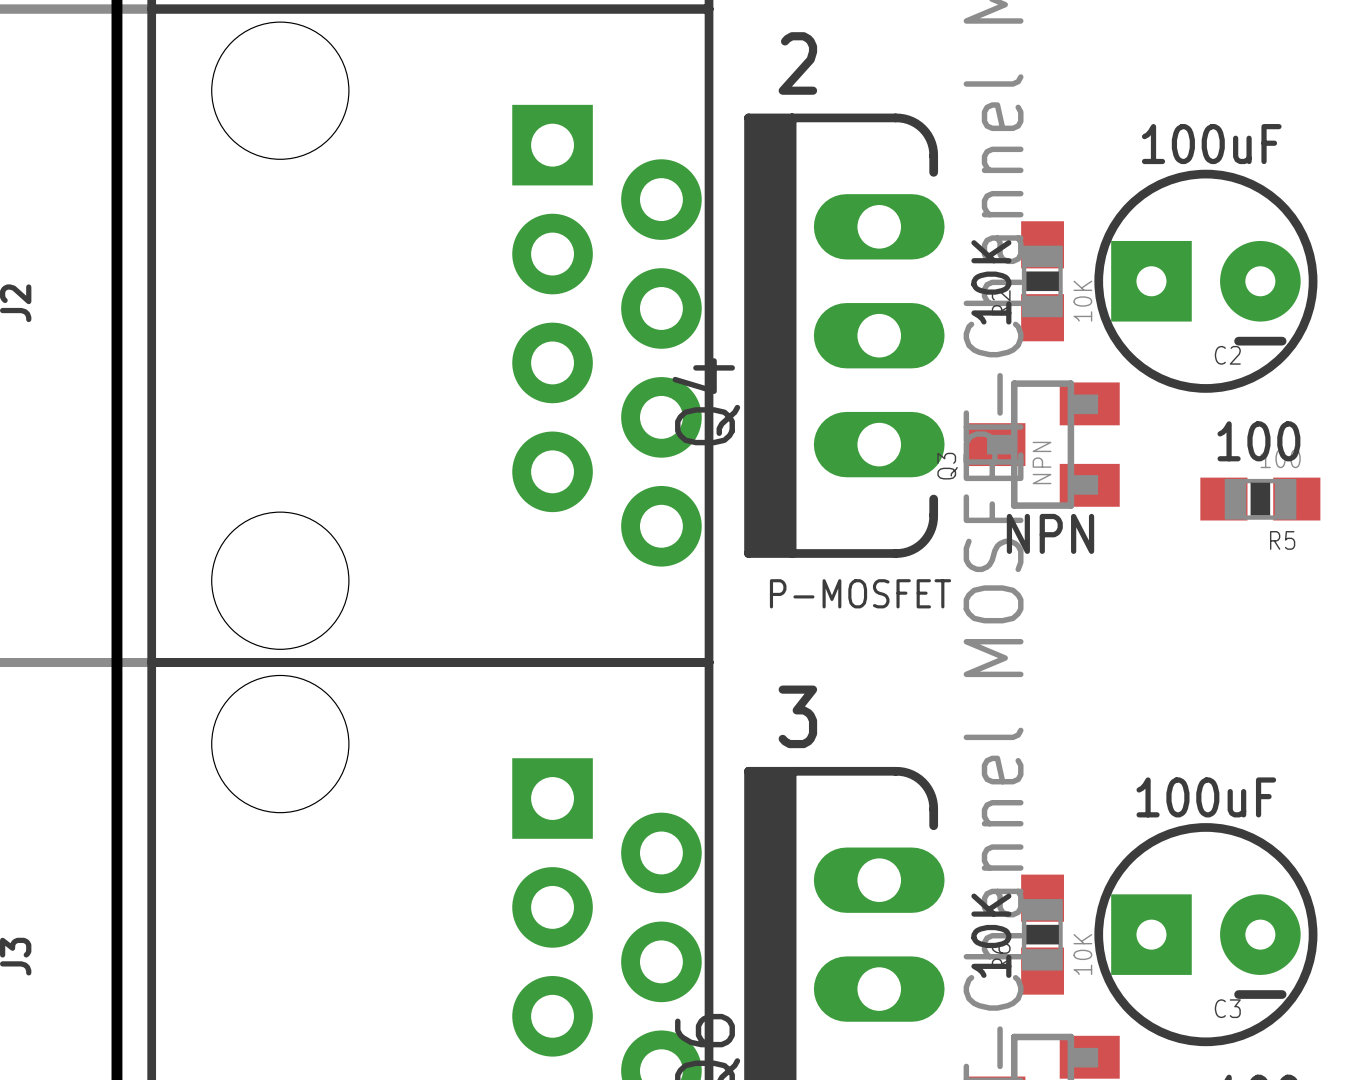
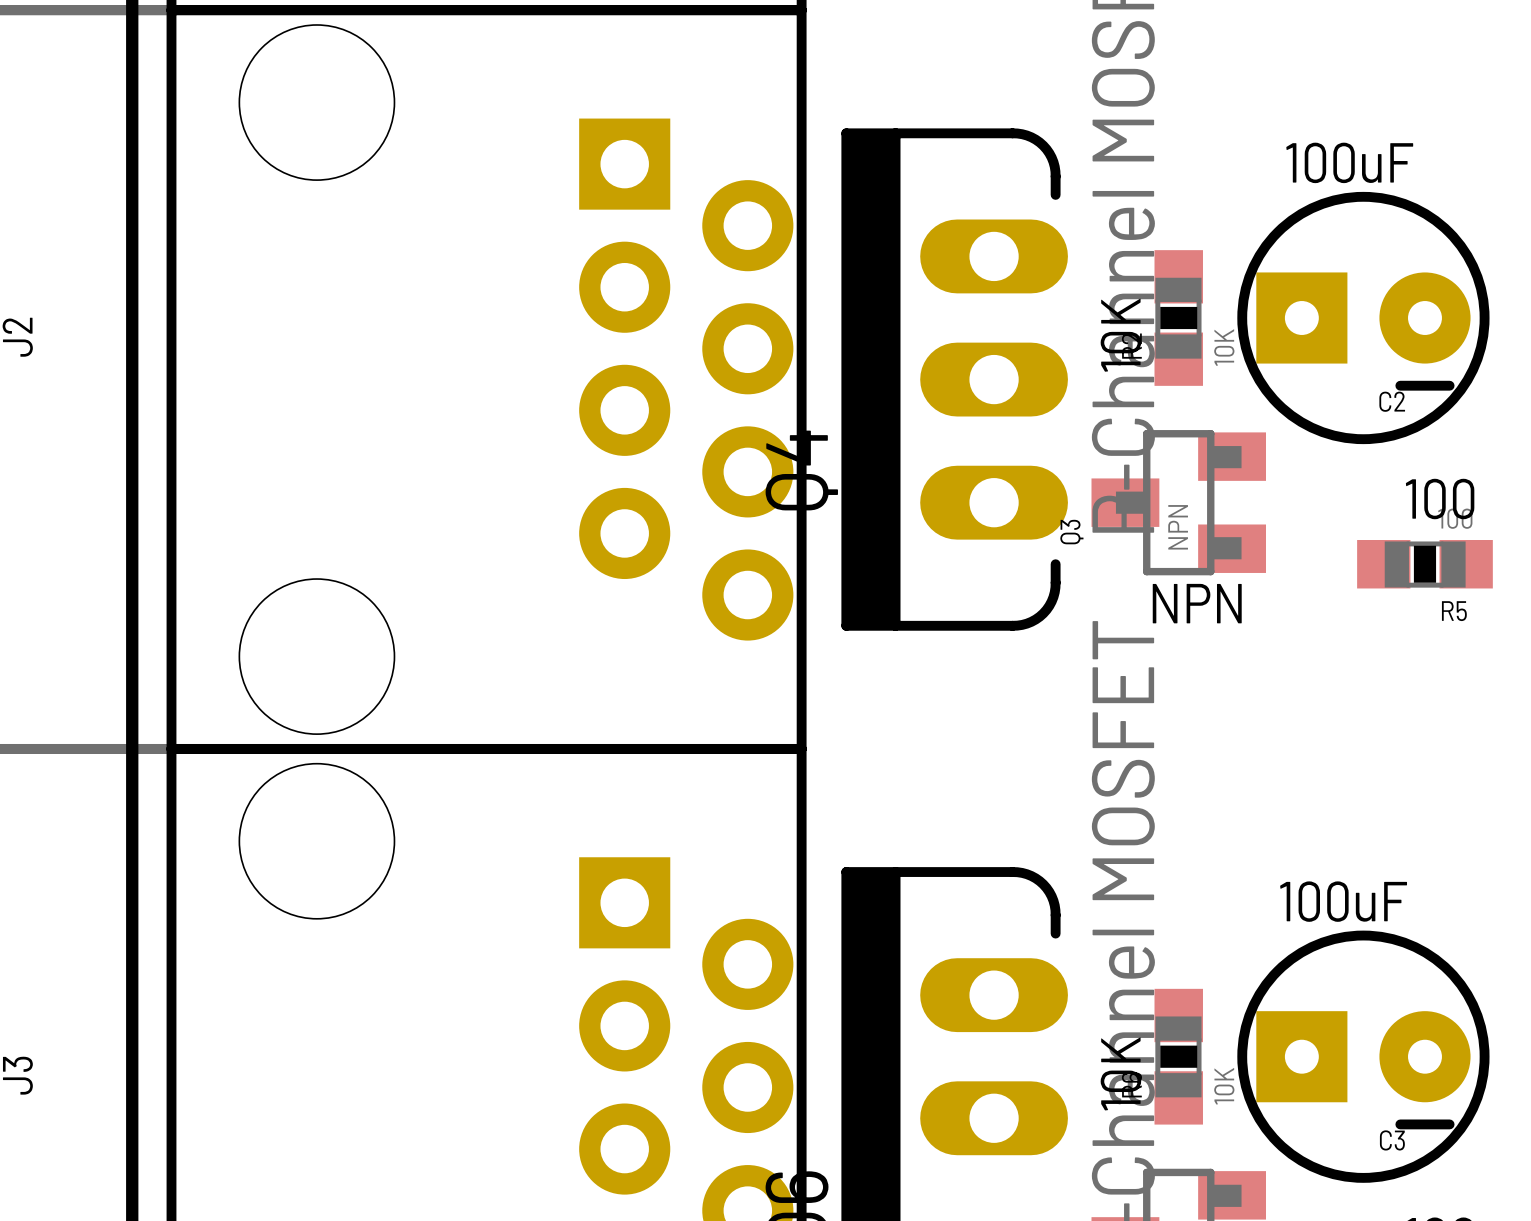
text: 2 (797, 63) -> none
text: P-MOSFET (860, 593) -> none
text: 3 (797, 716) -> none

